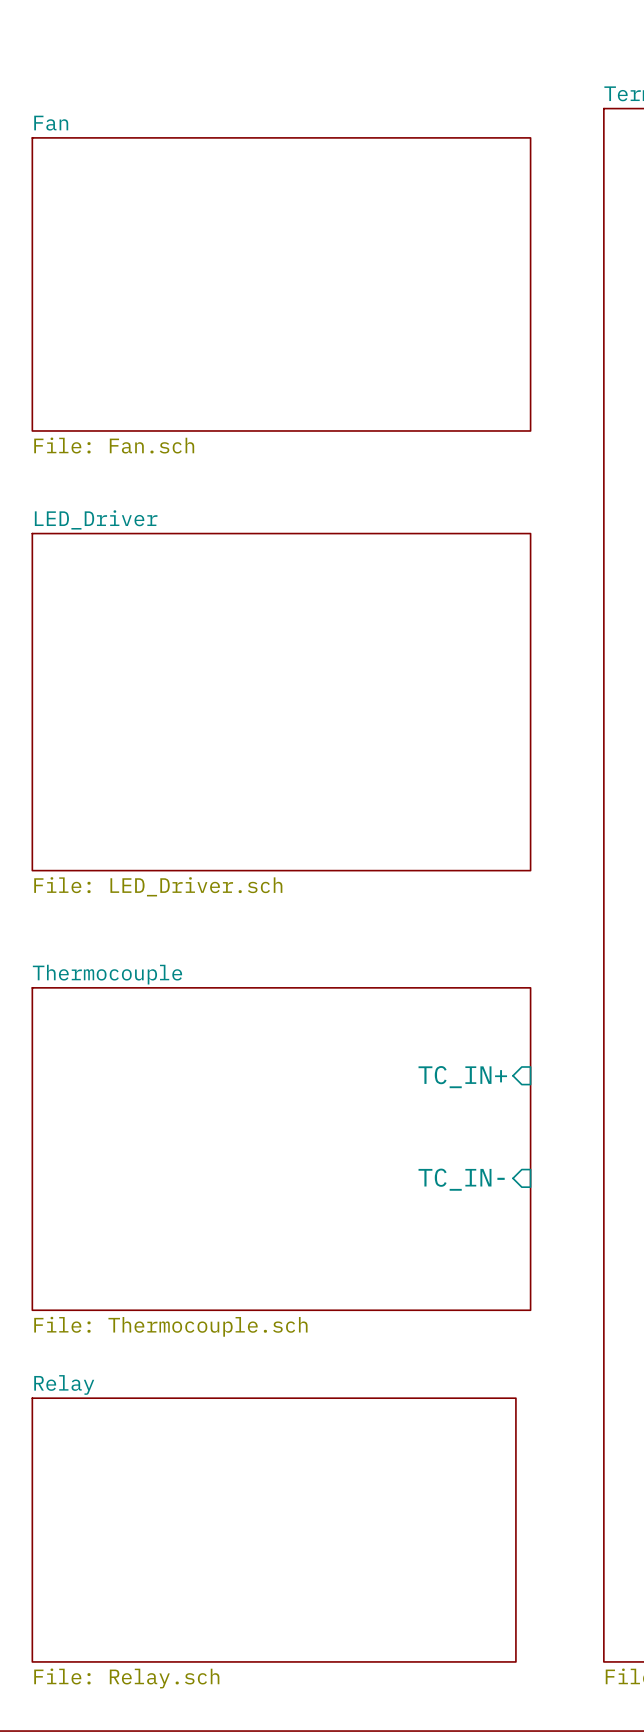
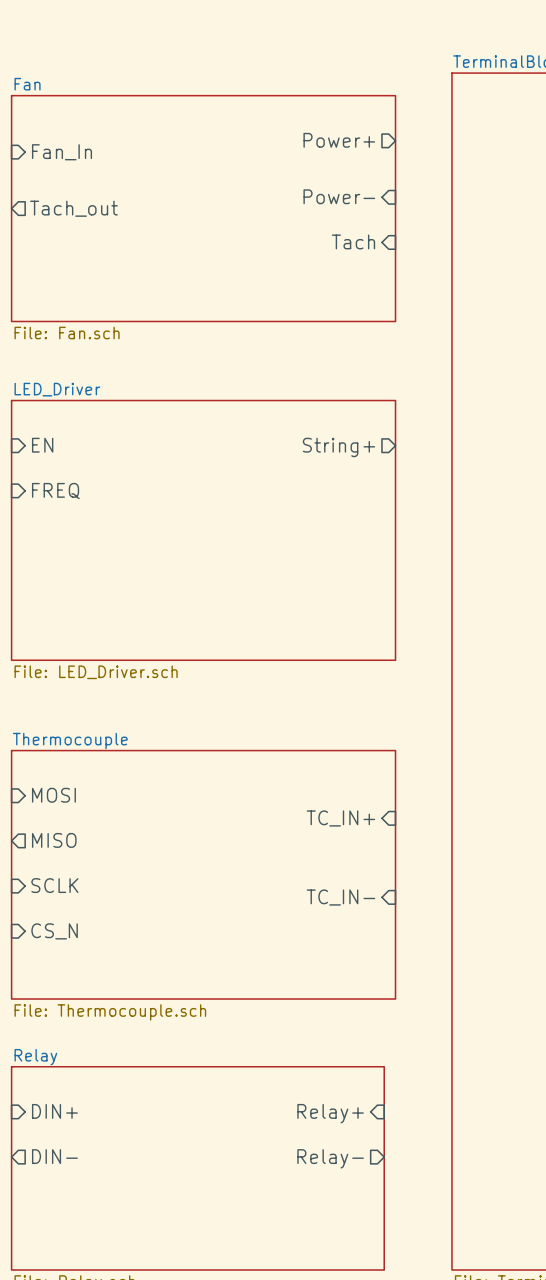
sheet pin: none -> Power+ (339, 140)
sheet pin: none -> Fan_In (62, 152)
sheet pin: none -> Power- (339, 196)
sheet pin: none -> Tach_out (73, 208)
sheet pin: none -> Tach (353, 241)
sheet pin: none -> EN (42, 445)
sheet pin: none -> String+ (338, 447)
sheet pin: none -> FREQ (55, 491)
sheet pin: none -> MOSI (53, 795)
sheet pin: none -> MISO (54, 840)
sheet pin: none -> SCLK (54, 885)
sheet pin: none -> CS_N (54, 931)
sheet pin: none -> DIN+ (54, 1111)
sheet pin: none -> Relay+ (330, 1113)
sheet pin: none -> DIN- (54, 1156)
sheet pin: none -> Relay- (330, 1158)

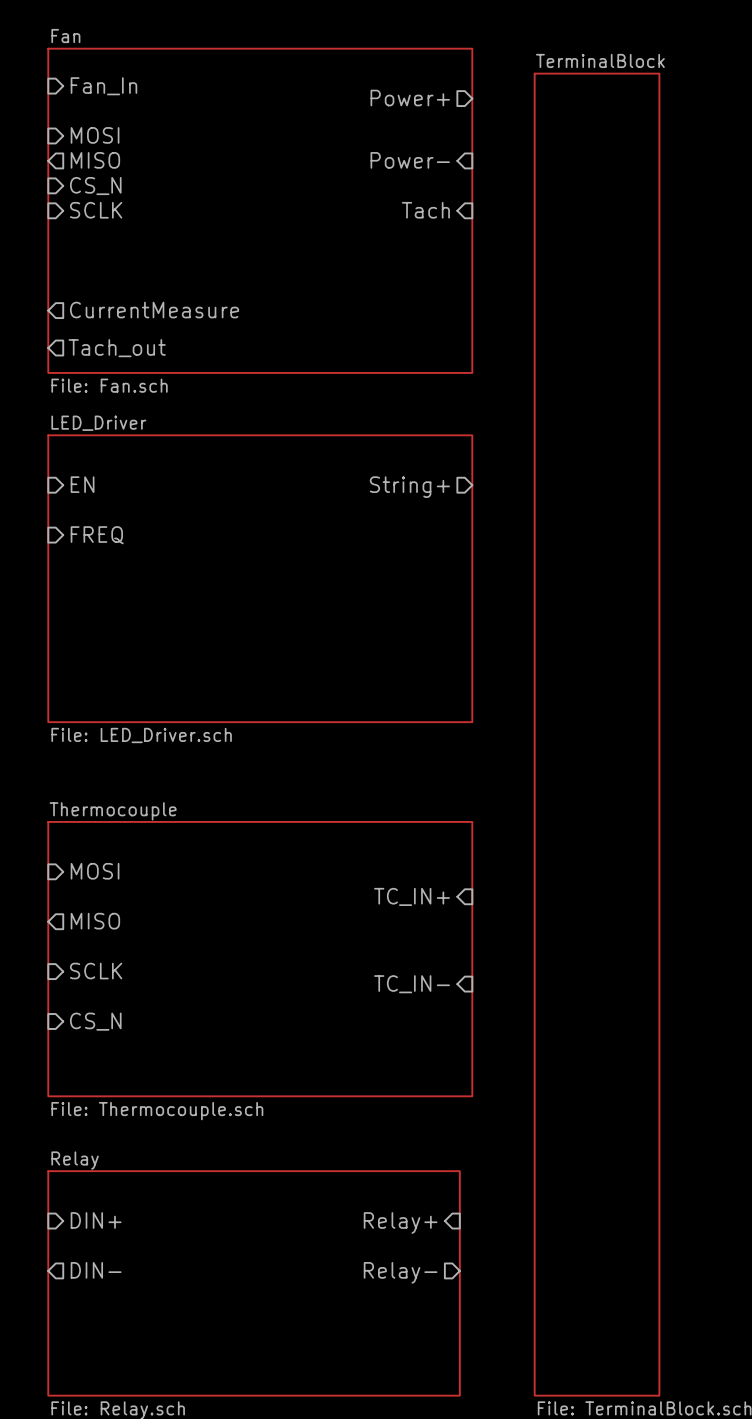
sheet pin: none -> Fan_In (103, 86)
sheet pin: none -> MOSI (95, 135)
sheet pin position: Power+ (339, 140) -> Power+ (410, 98)
sheet pin: none -> Power- (410, 160)
sheet pin shape: input (62, 152) -> output (95, 160)
sheet pin: Fan_In (62, 152) -> MISO (95, 160)
sheet pin: none -> CS_N (95, 186)
sheet pin: none -> SCLK (96, 210)
sheet pin: Power- (339, 196) -> Tach (425, 210)
sheet Fan: none -> File: Fan.sch (260, 210)
sheet pin position: Tach_out (73, 208) -> Tach_out (117, 348)
sheet Fan: File: Fan.sch (203, 208) -> none
sheet pin: Tach (353, 241) -> none
sheet pin: none -> CurrentMeasure (154, 310)

